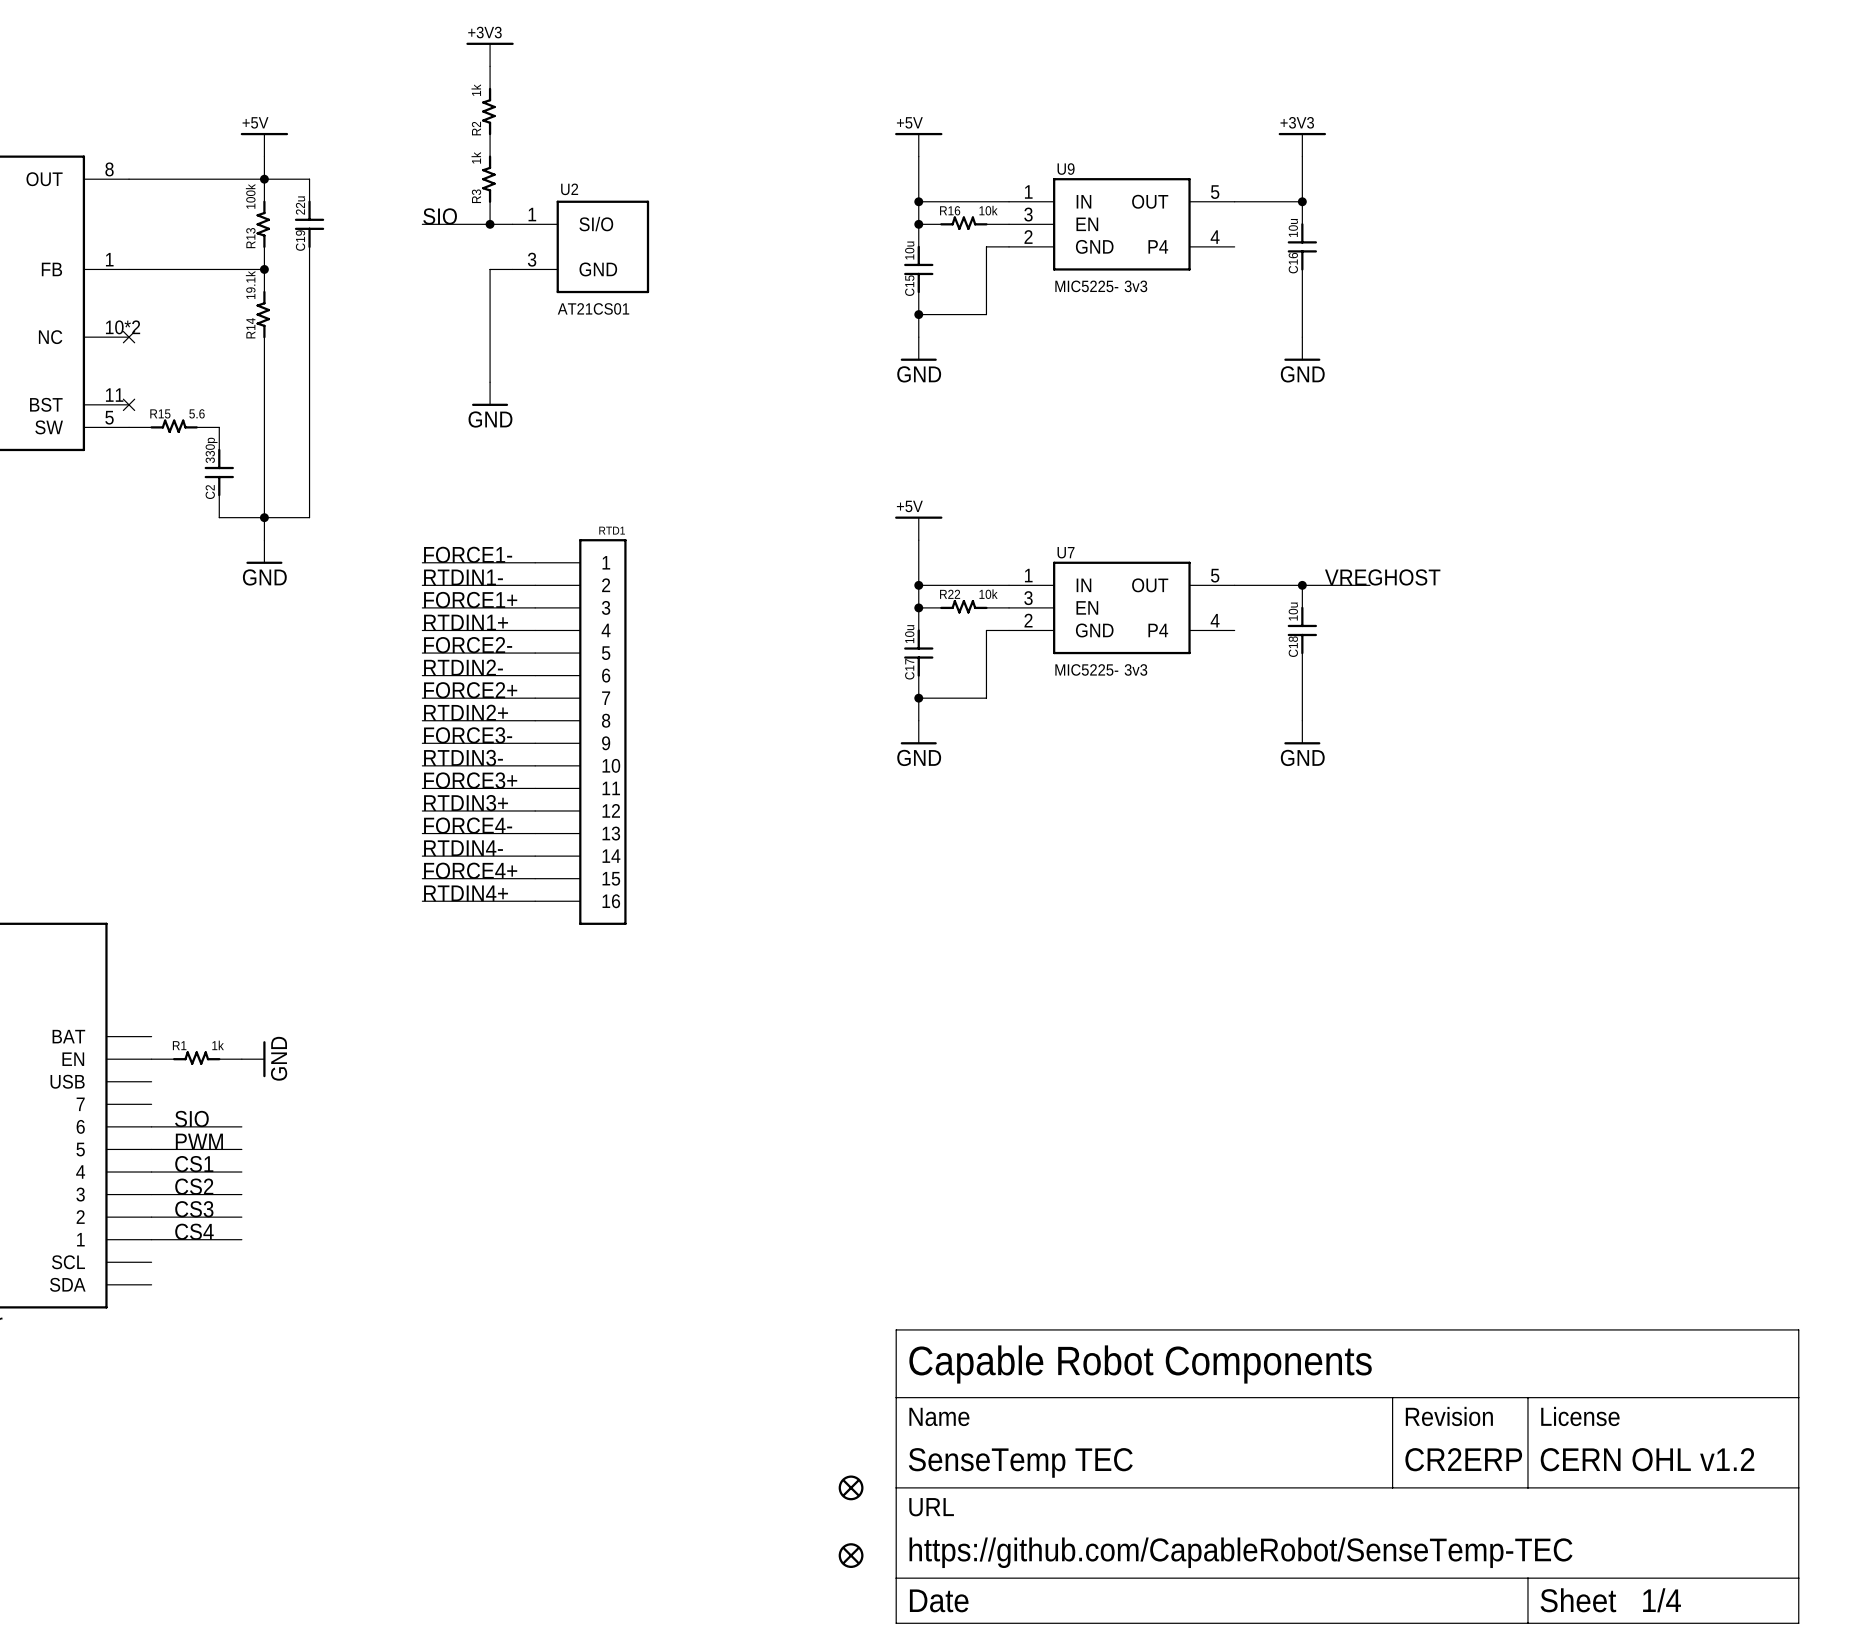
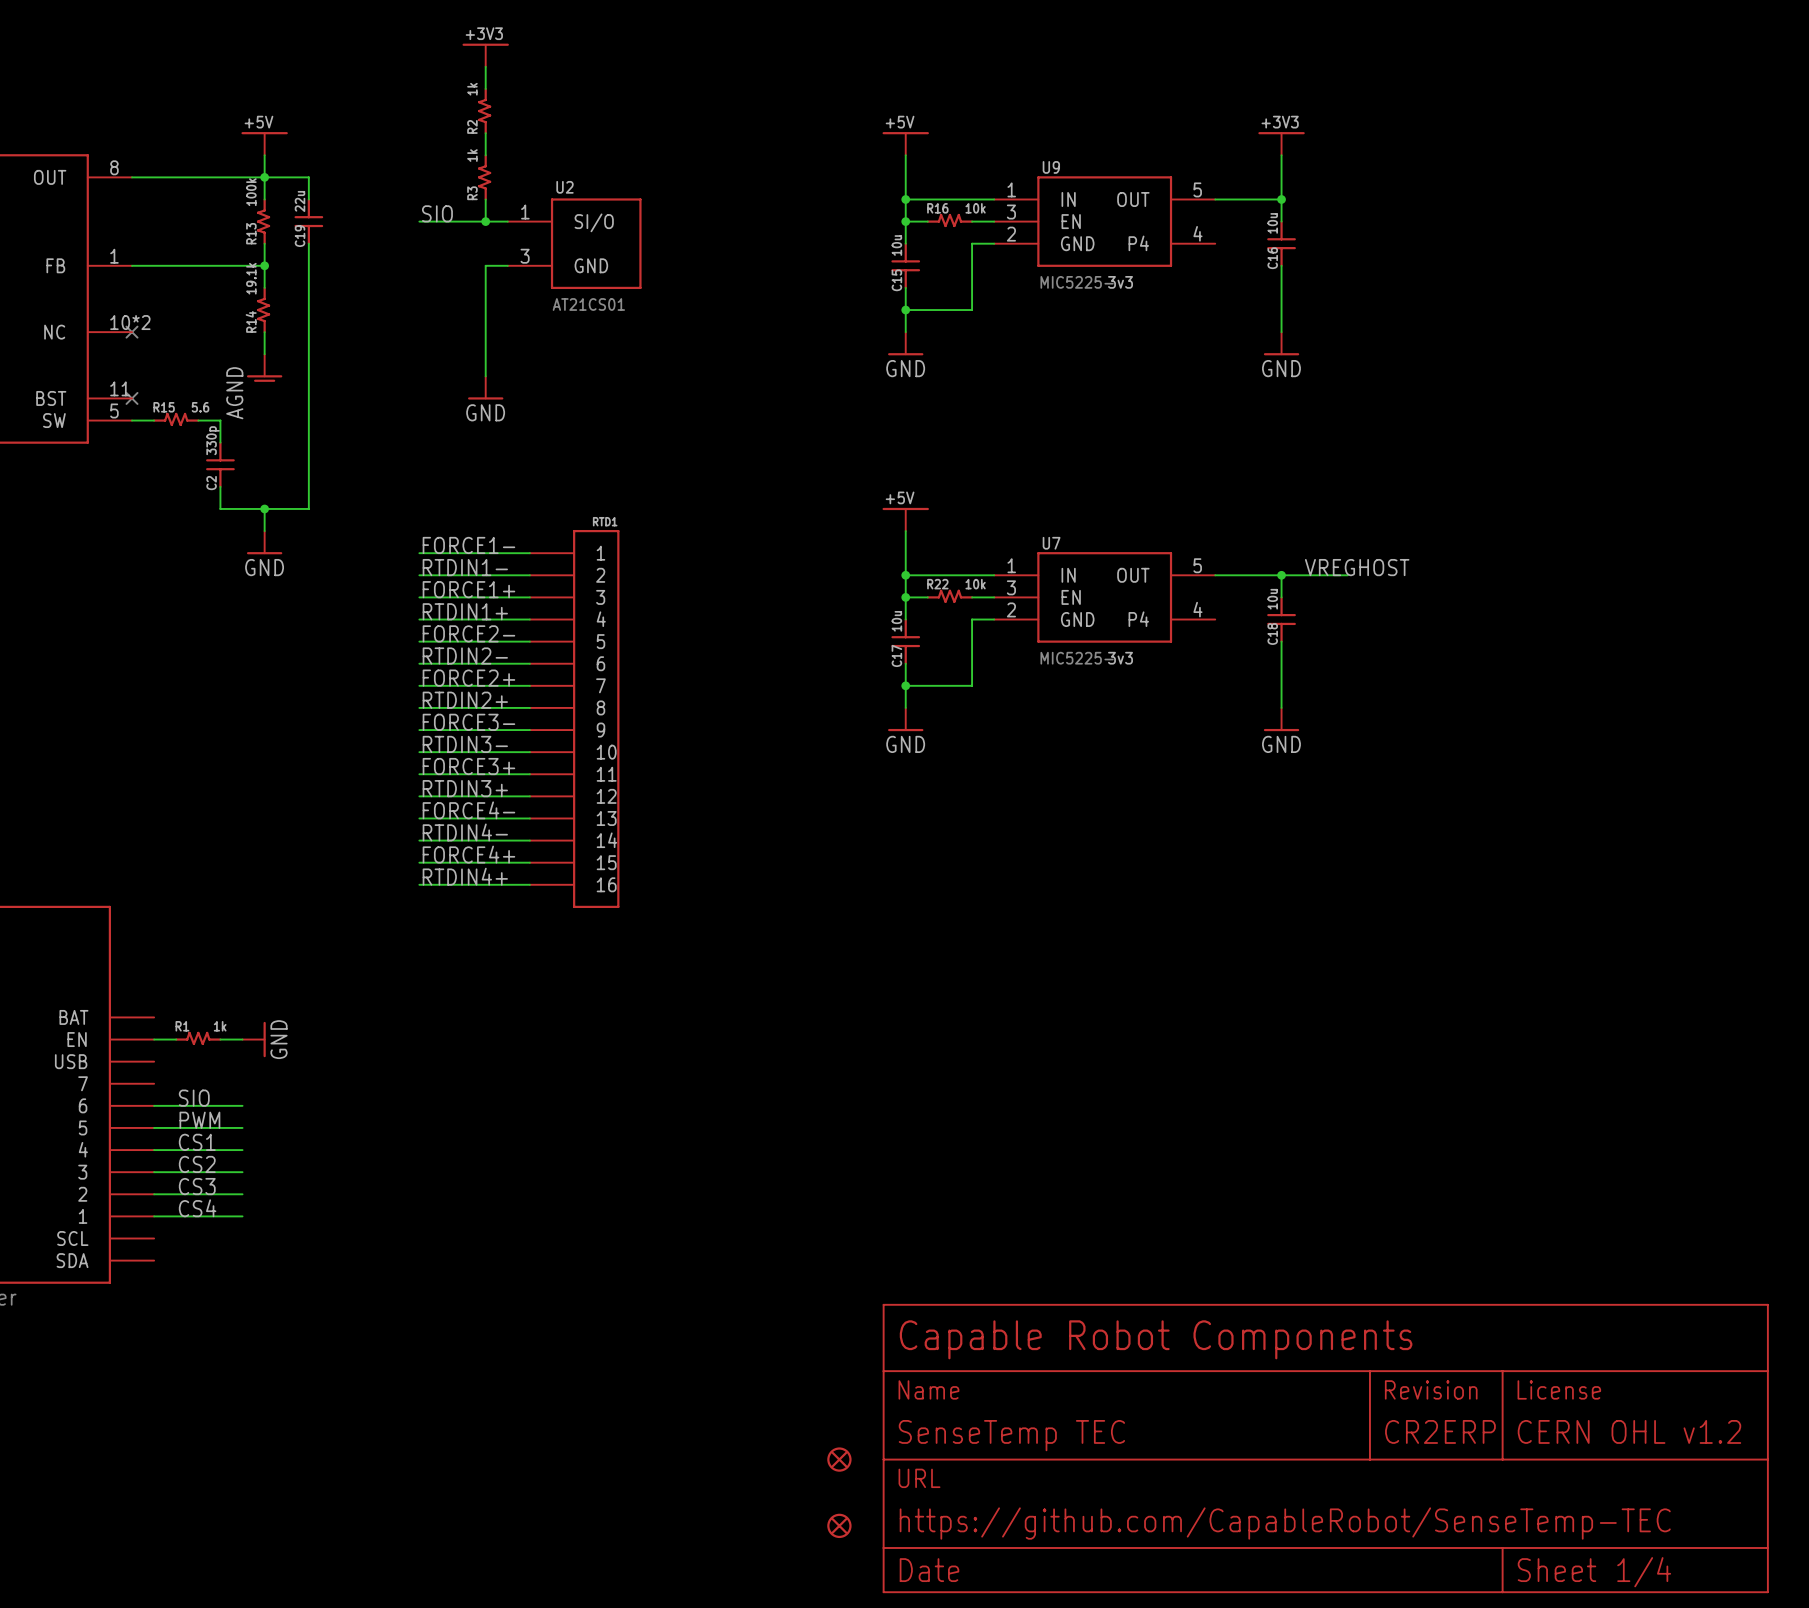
wire: (264, 359) (264, 517) -> none
power symbol: none -> AGND (264, 368)

